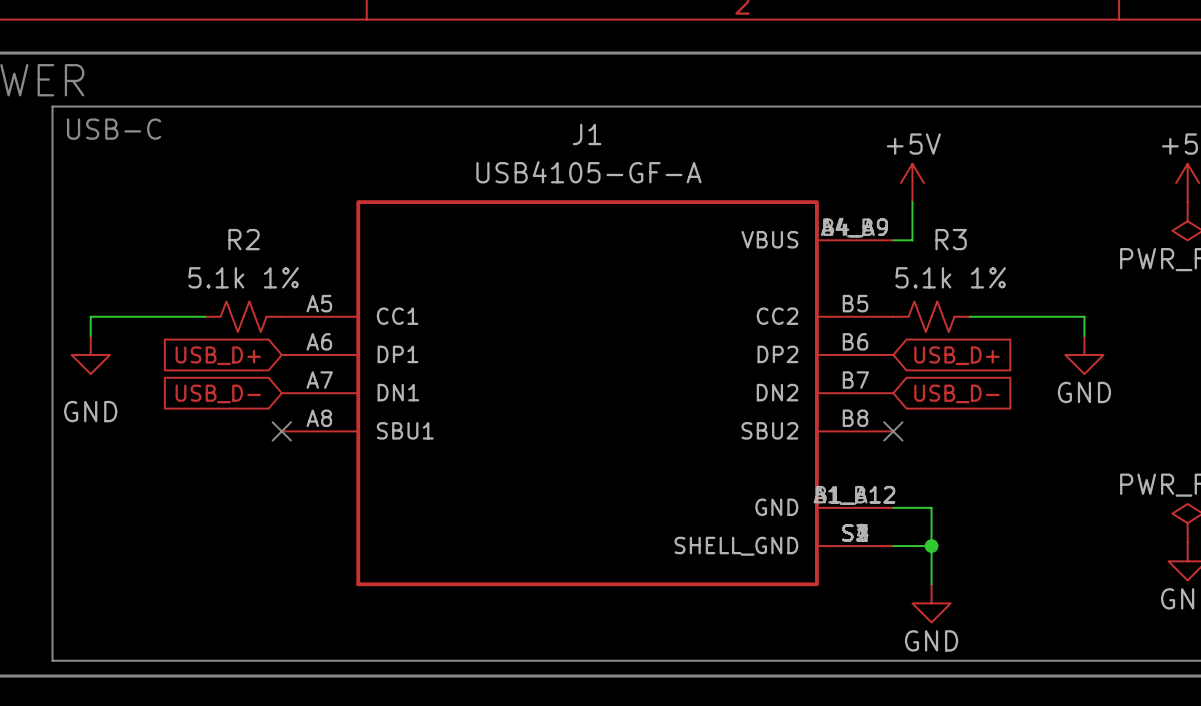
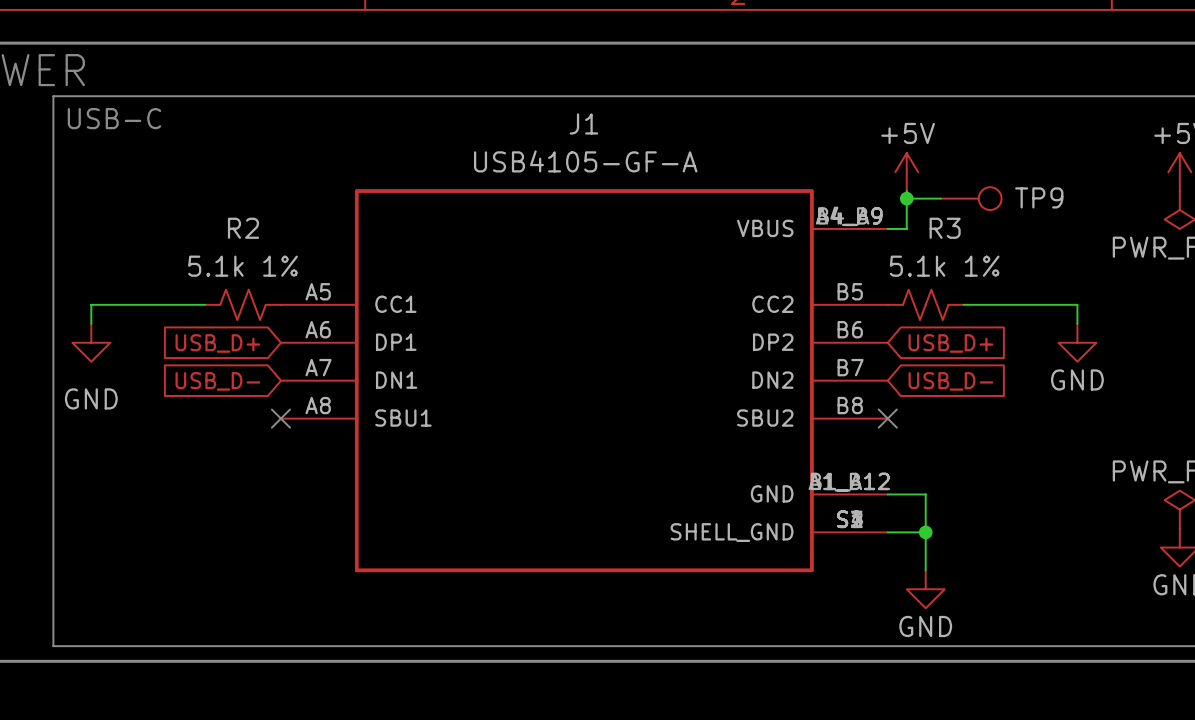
wire: none -> (906, 198) (940, 198)
junction: none -> (906, 198)
TP9: none -> (971, 198)

